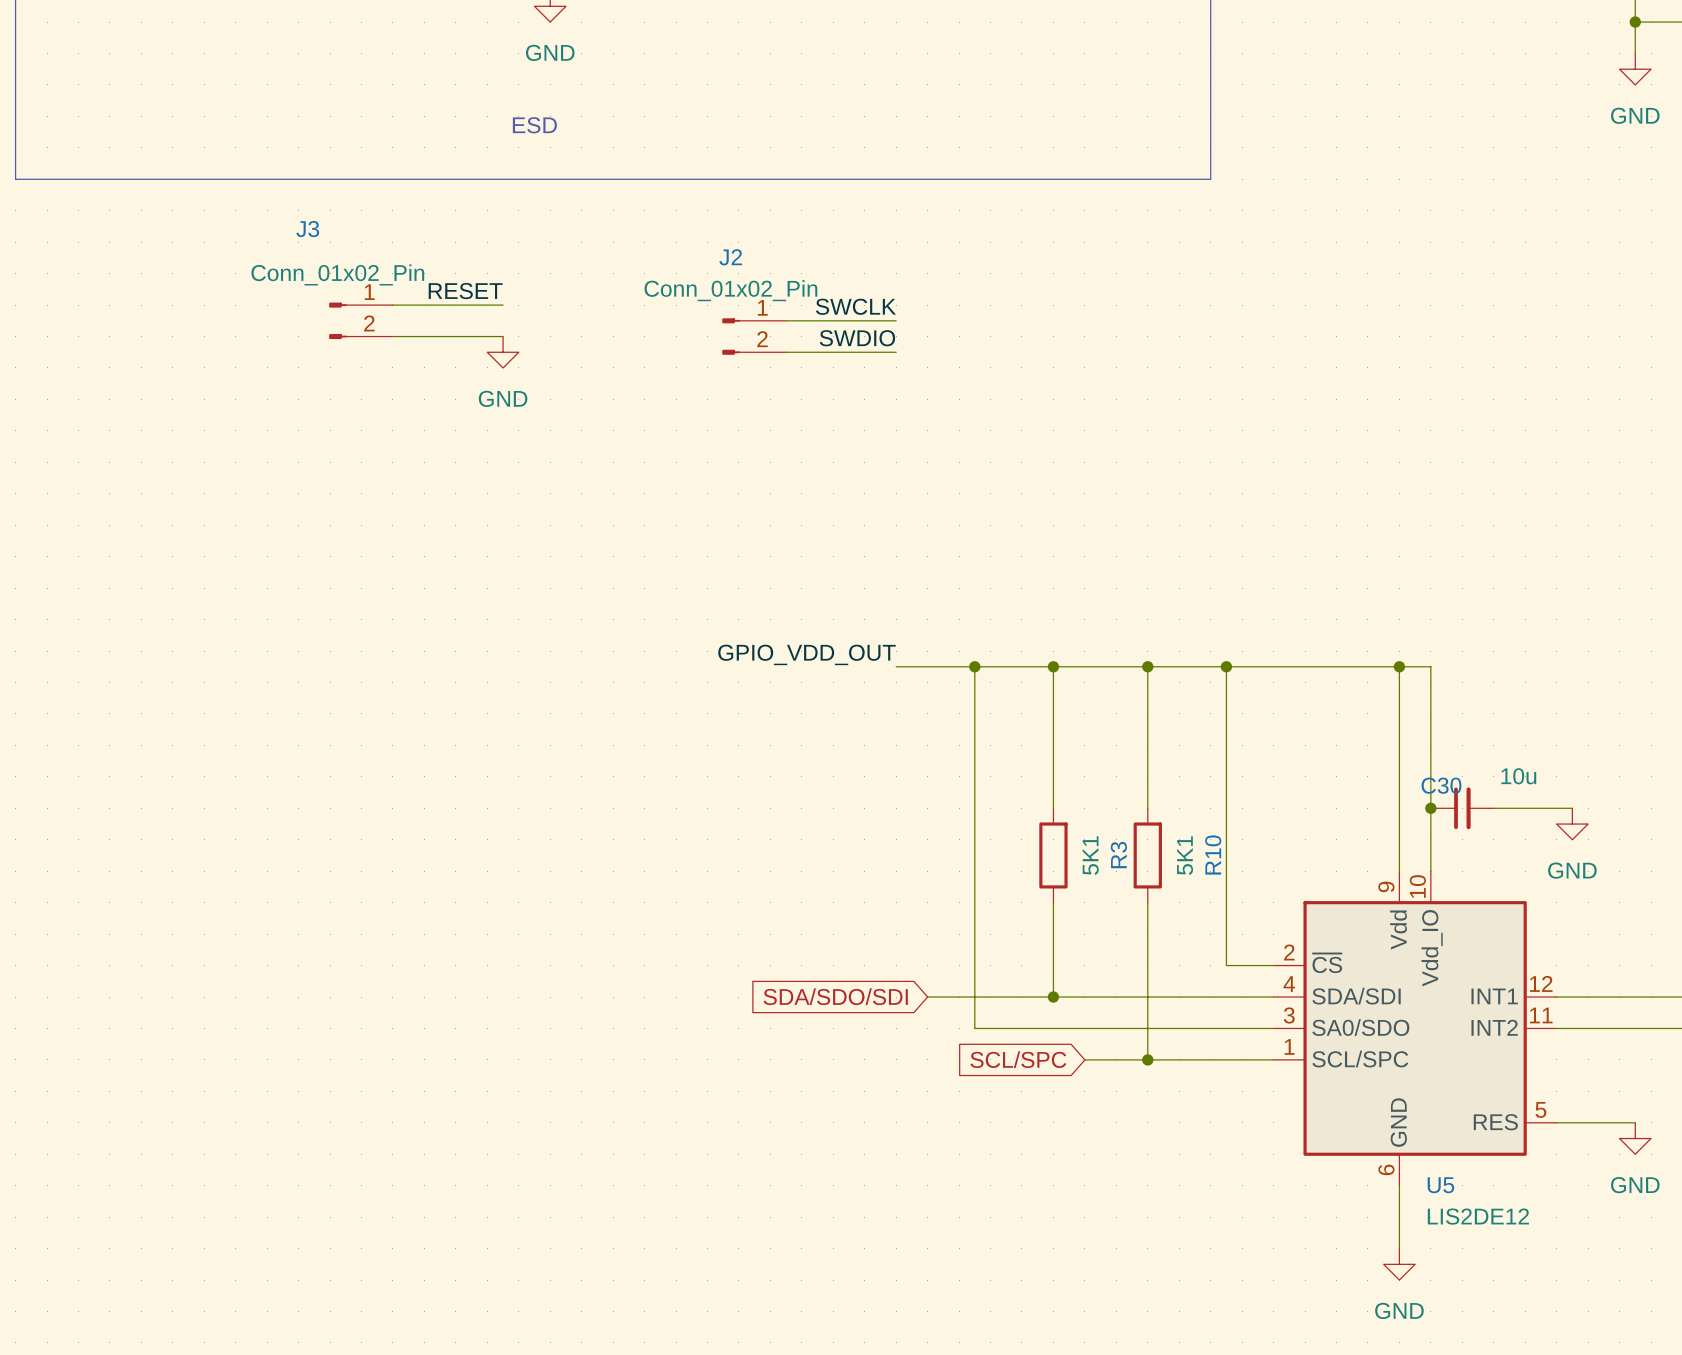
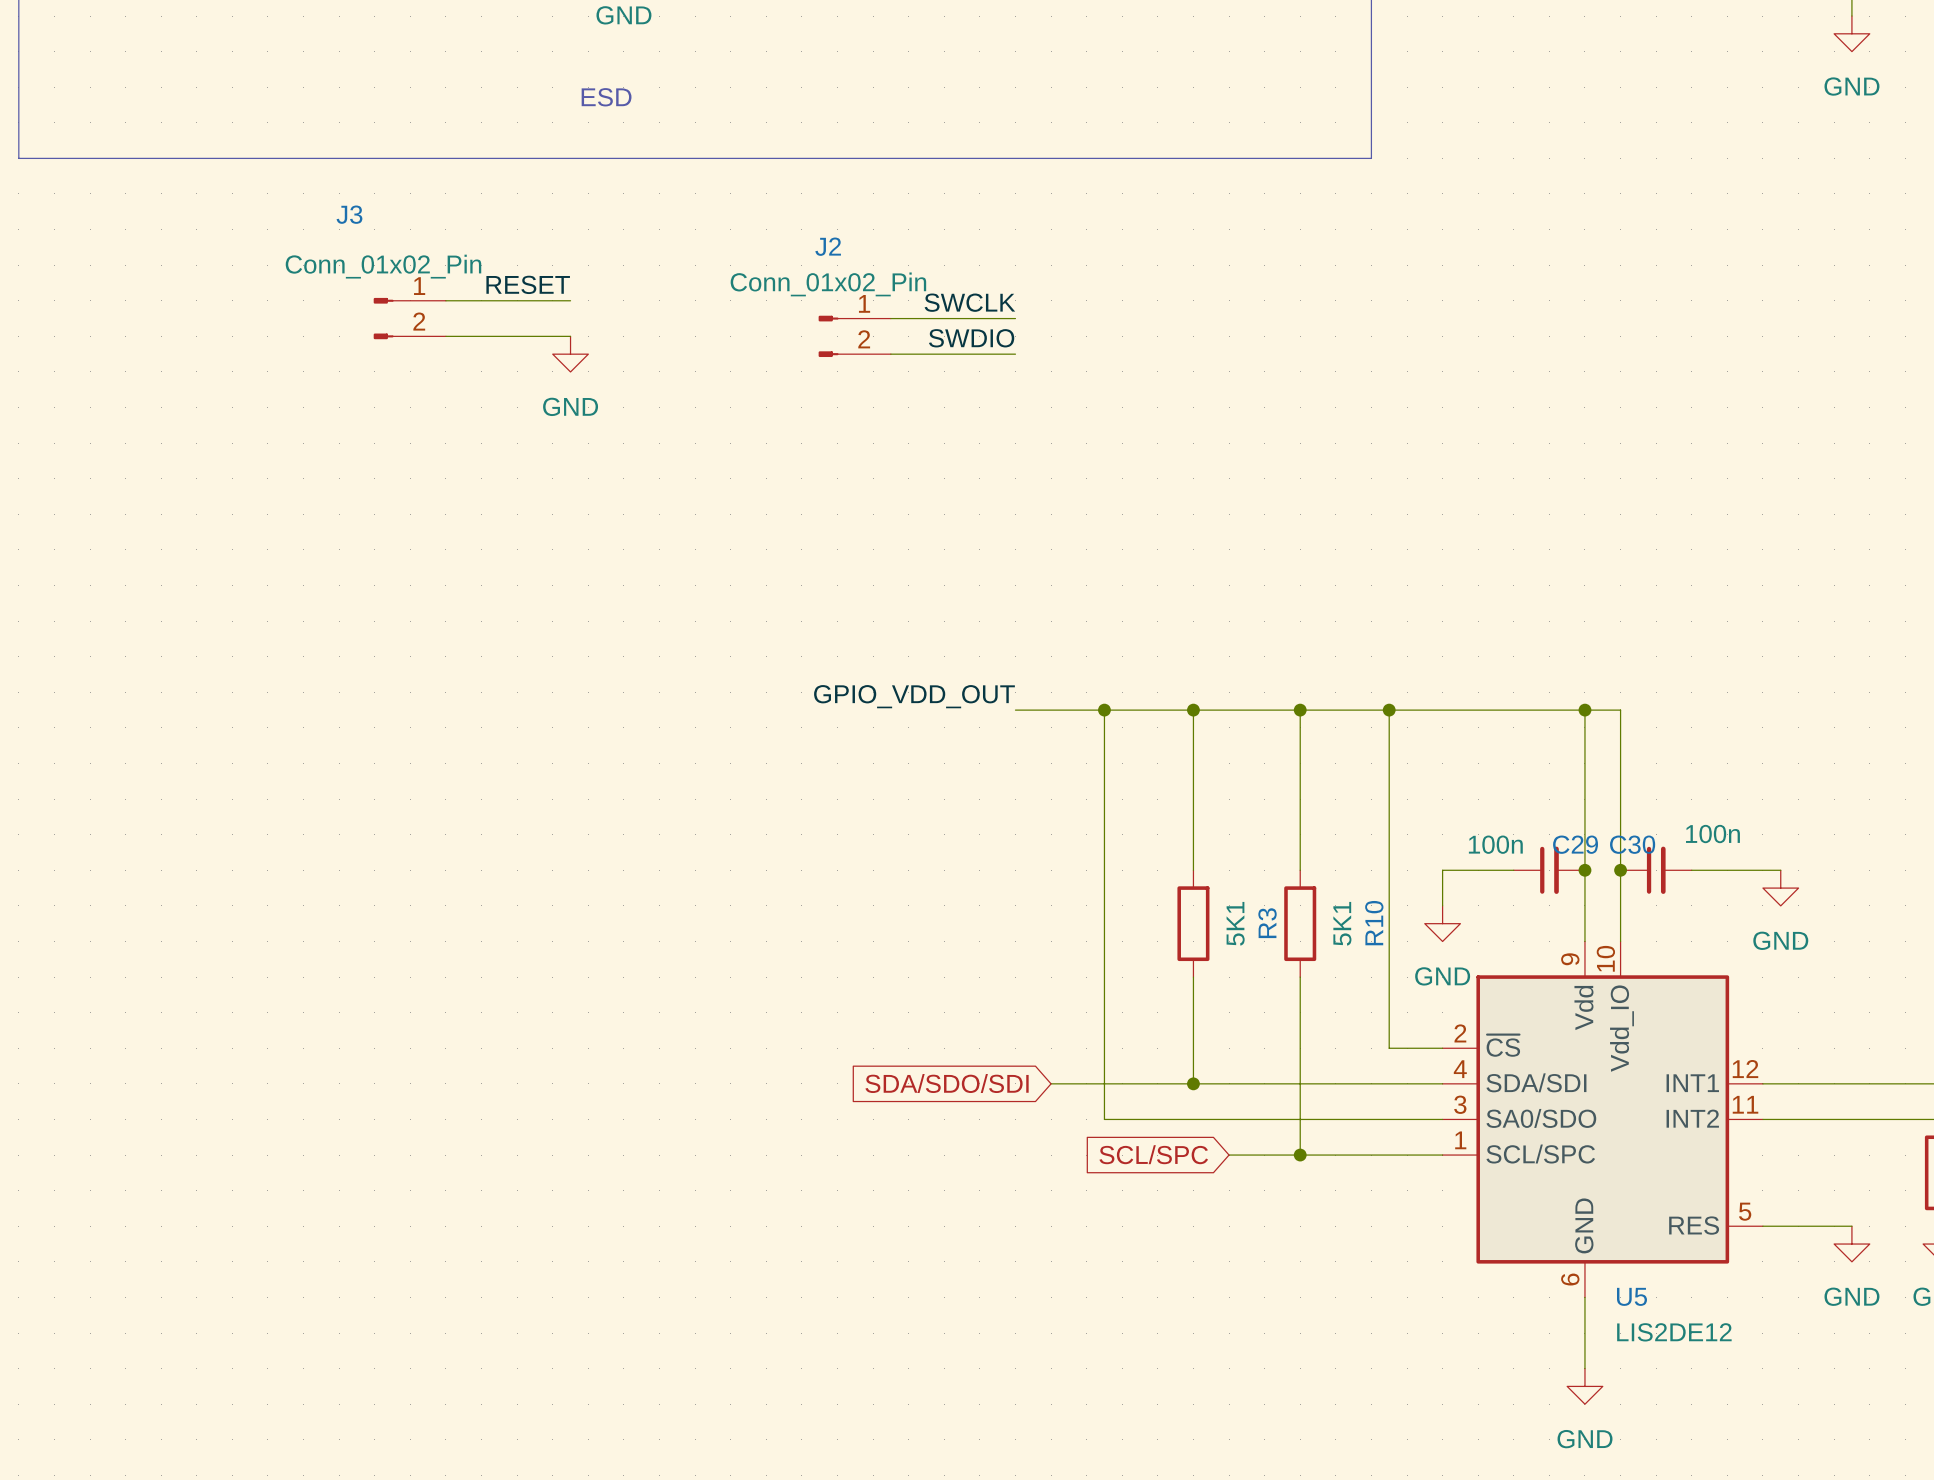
C30 value: 10u (1518, 776) -> 100n (1712, 834)
wire: none -> (1513, 870) (1442, 870) (1442, 905)
C29: none -> 100n (1549, 870)
junction: none -> (1584, 870)
power symbol: none -> GND (1442, 923)

